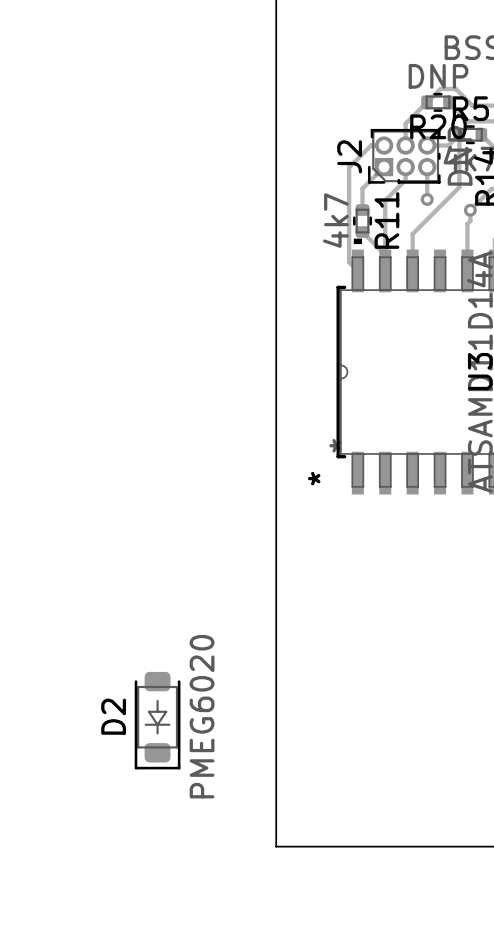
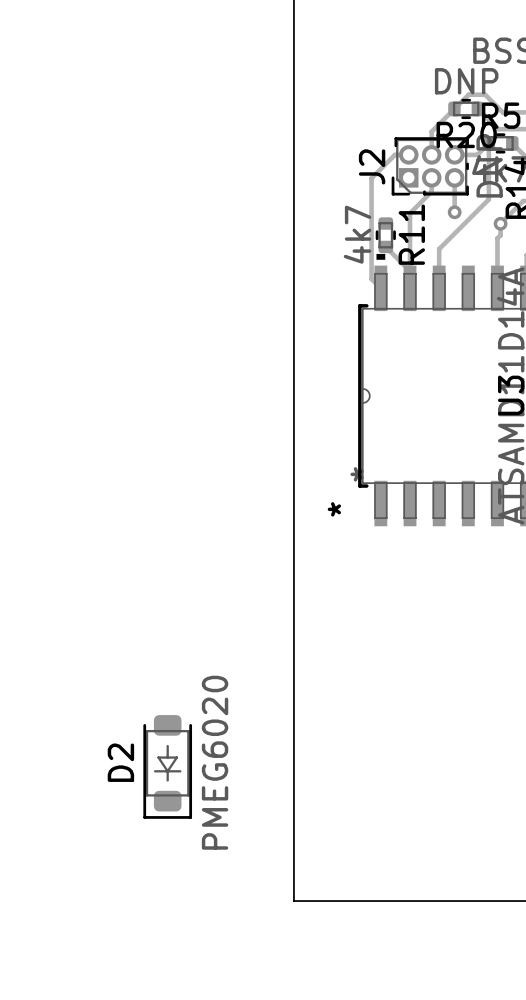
track: (384, 167) (362, 188) (362, 210) -> none

